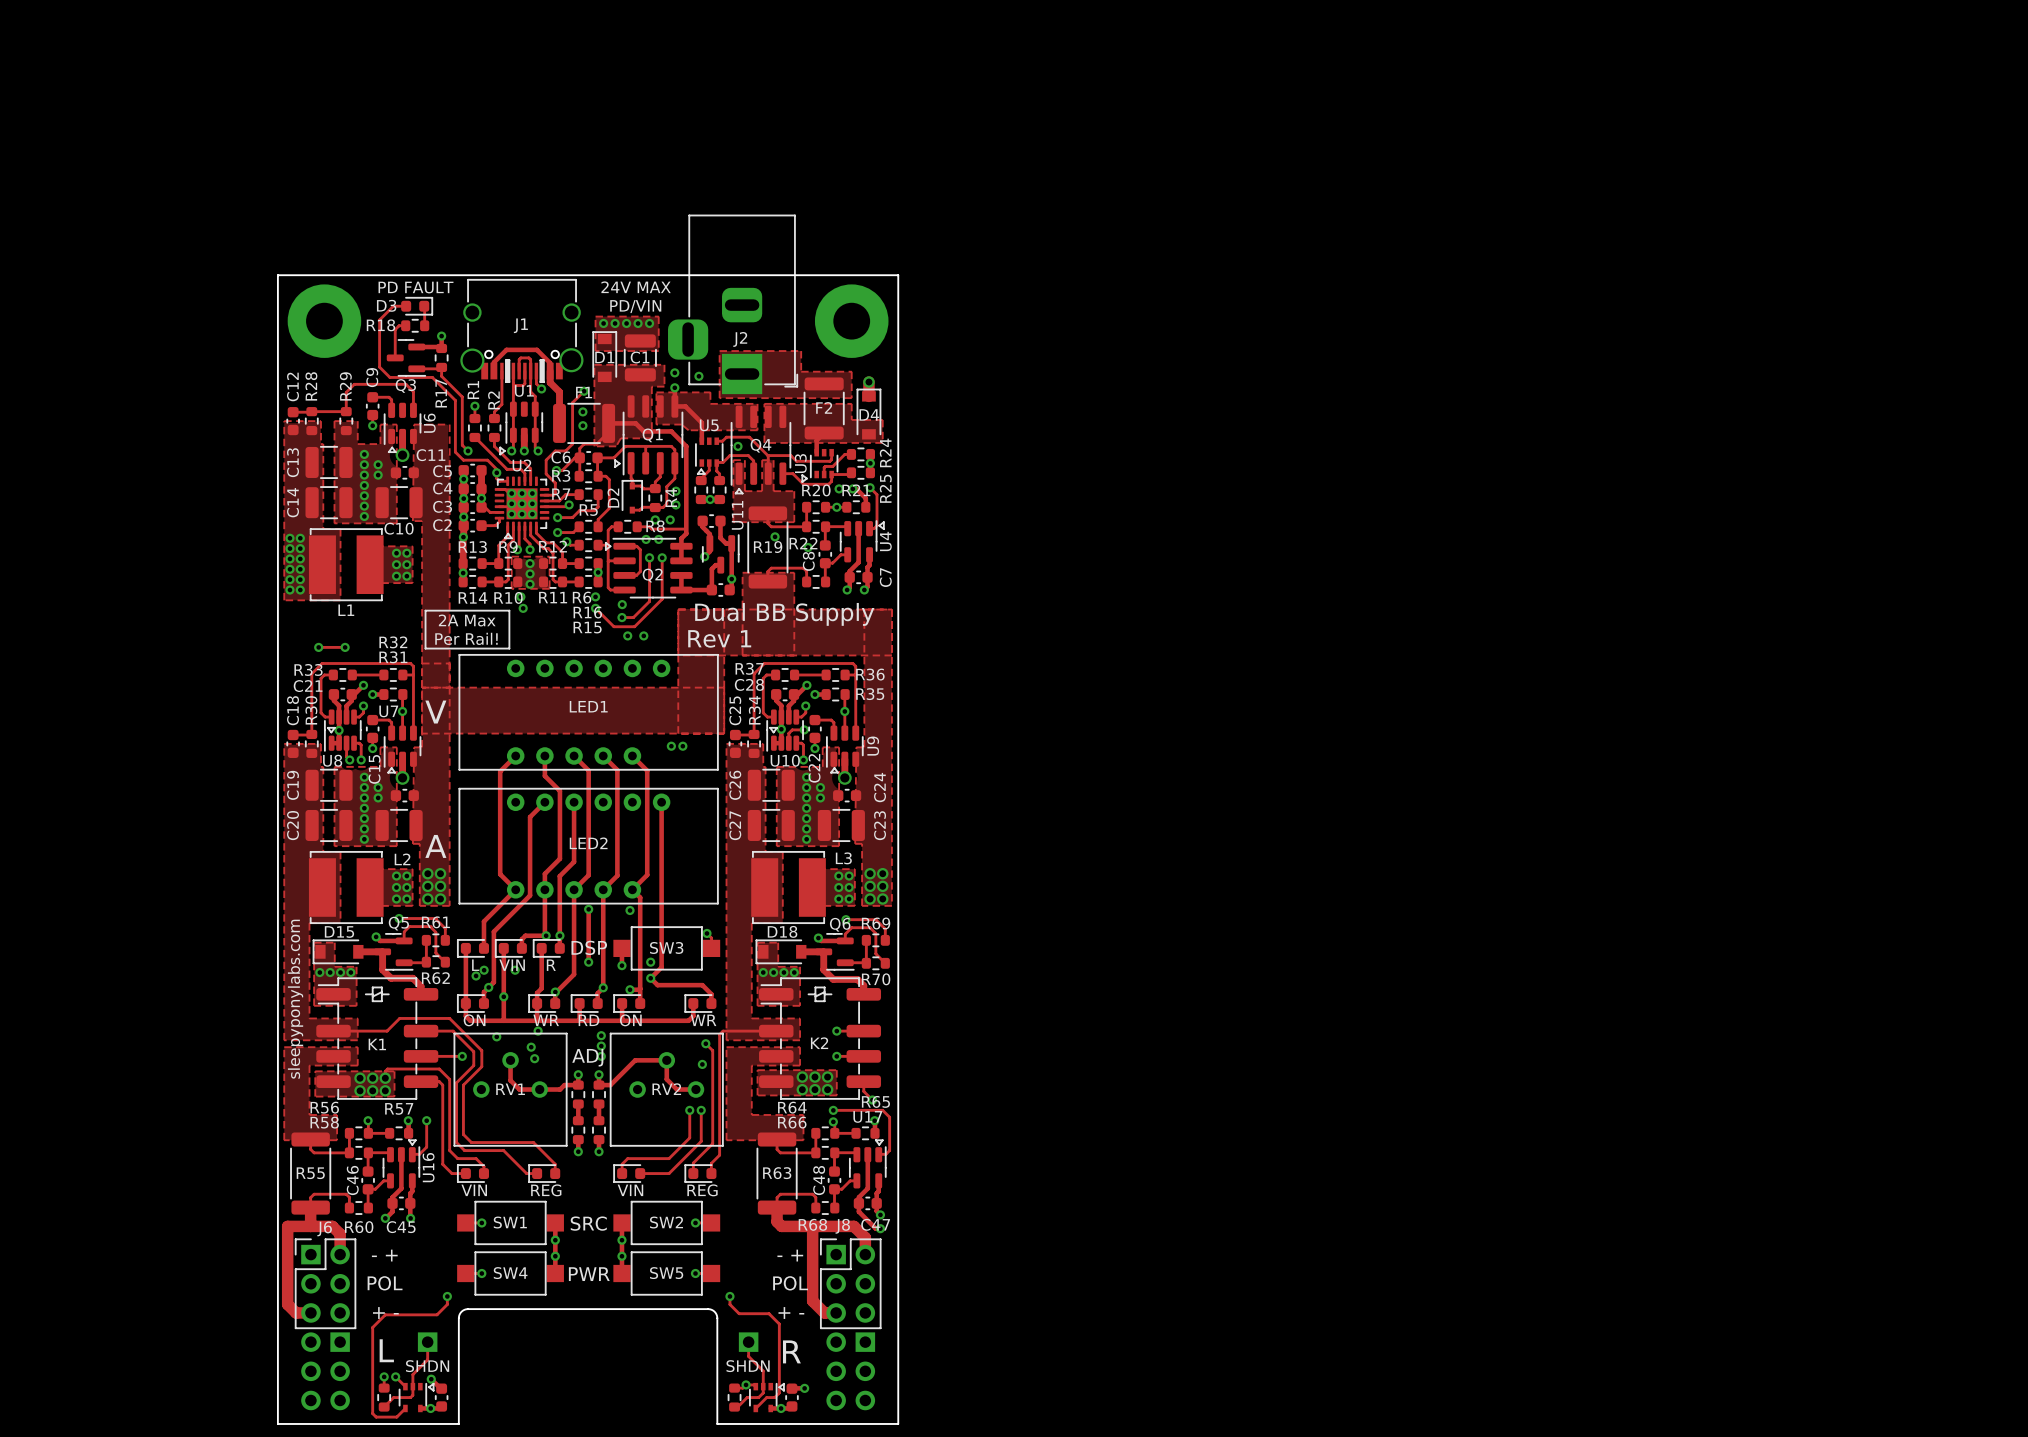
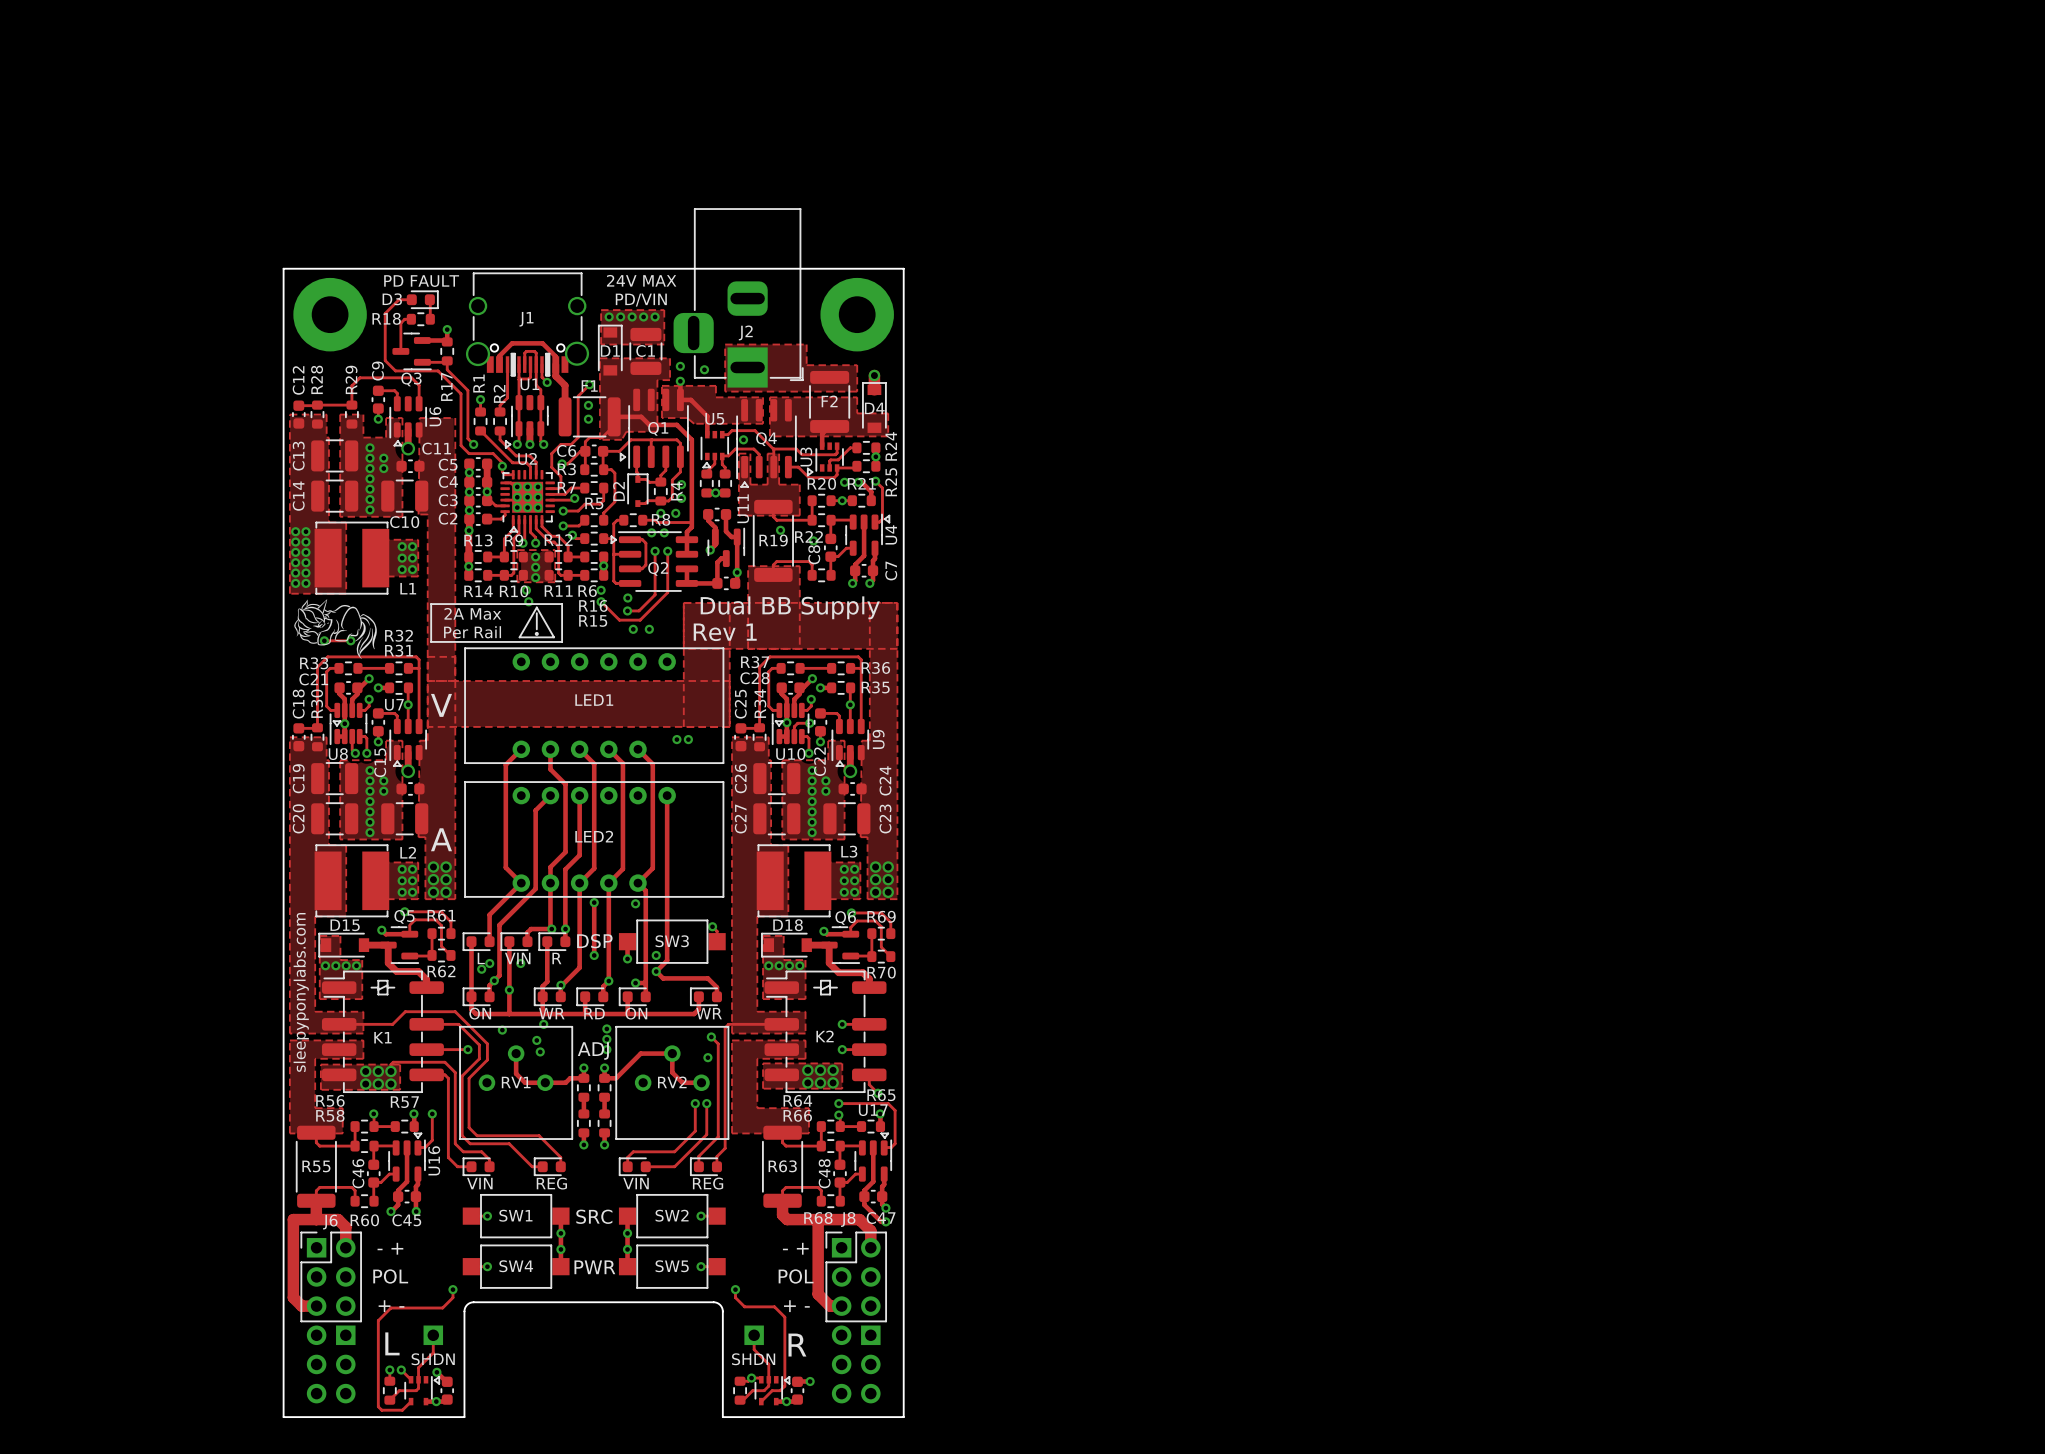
drawing: none -> [294, 599, 377, 659]
L1 name position: L1 (346, 610) -> L1 (408, 588)
line: (509, 610) (509, 648) -> (514, 604) (562, 604) (562, 641) (514, 641)
line: none -> (536, 607) (519, 637) (554, 637) (536, 607)
line: none -> (536, 613) (536, 629)
text: Per Rail! (466, 638) -> Per Rail (472, 632)
drawing: none -> [534, 631, 539, 636]

